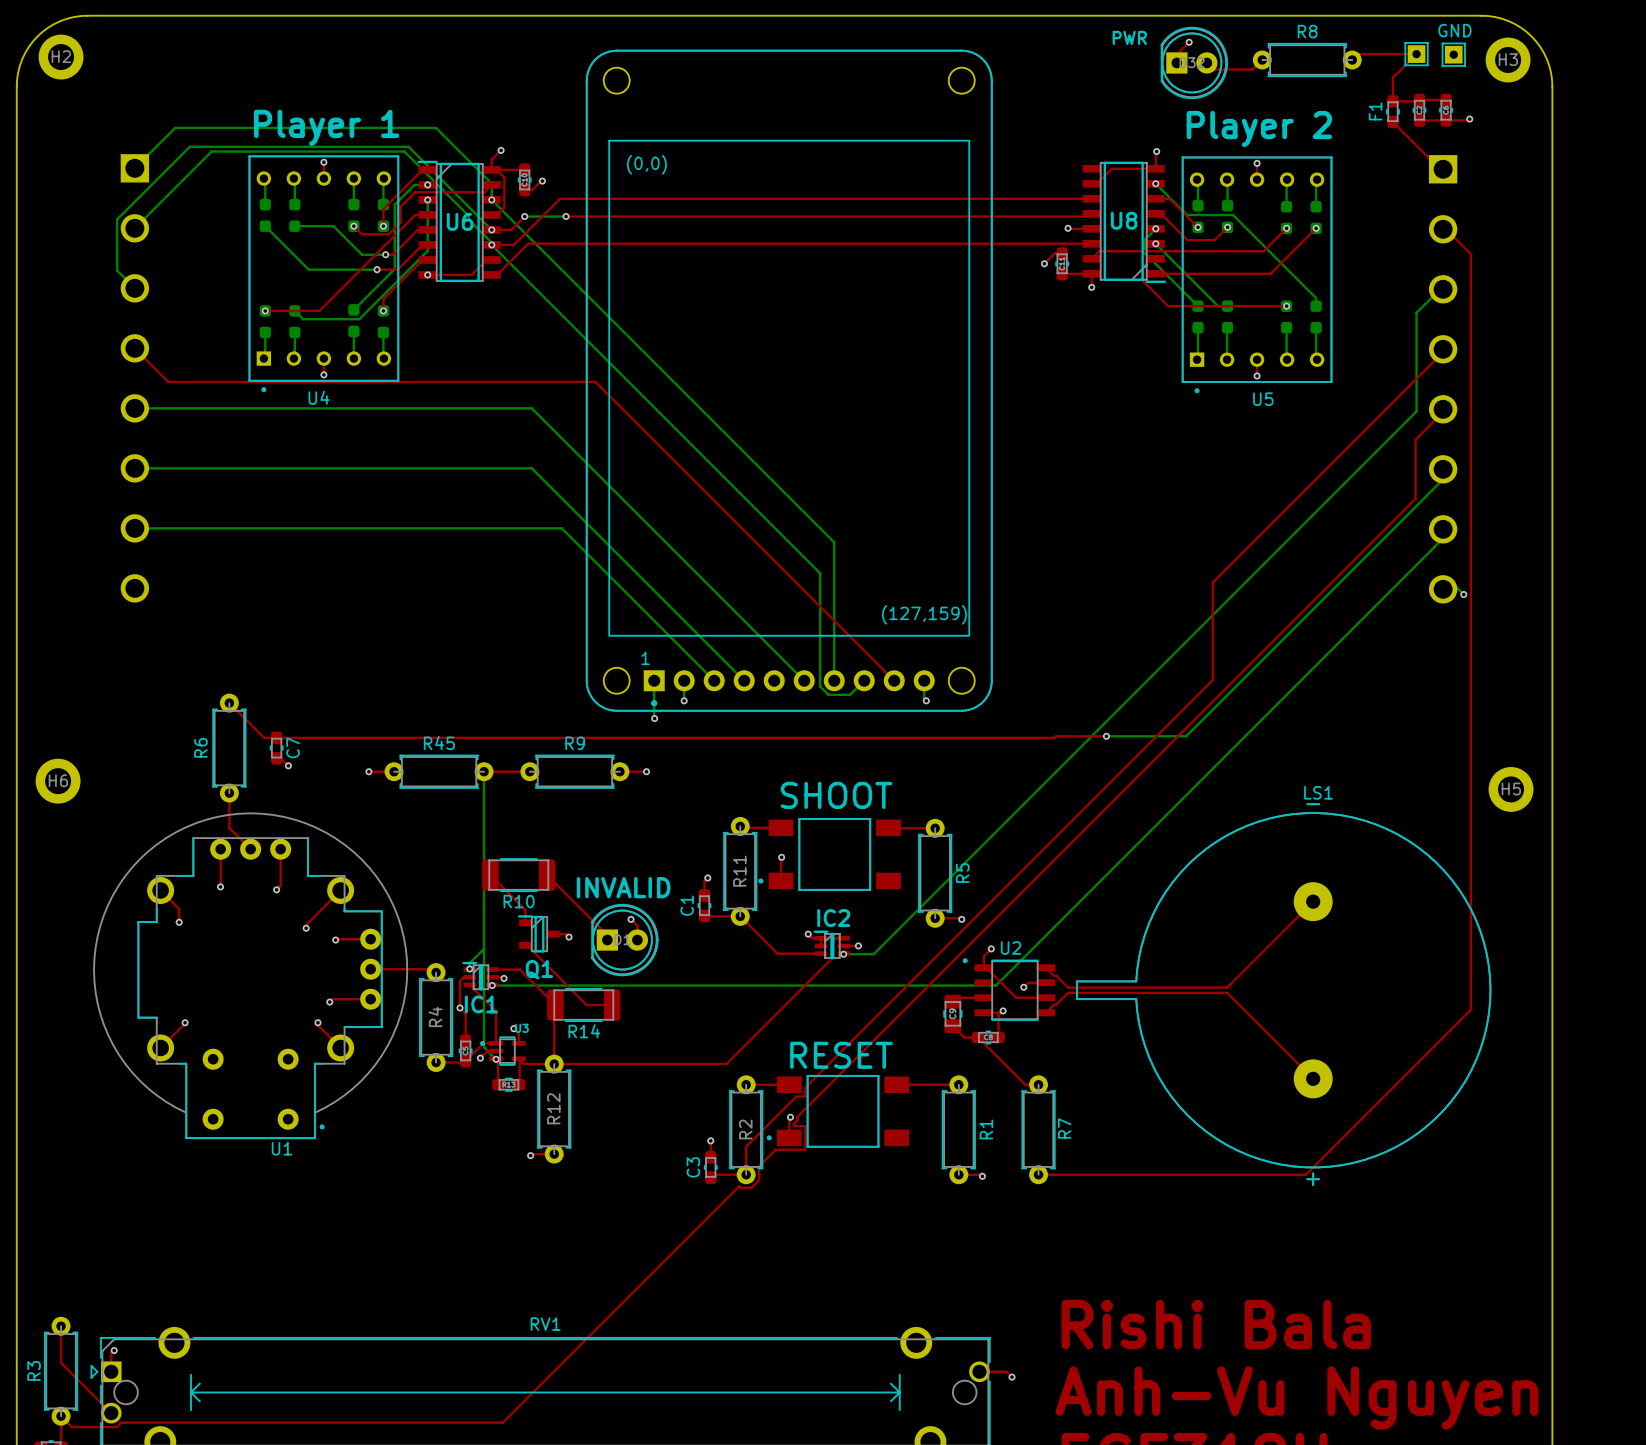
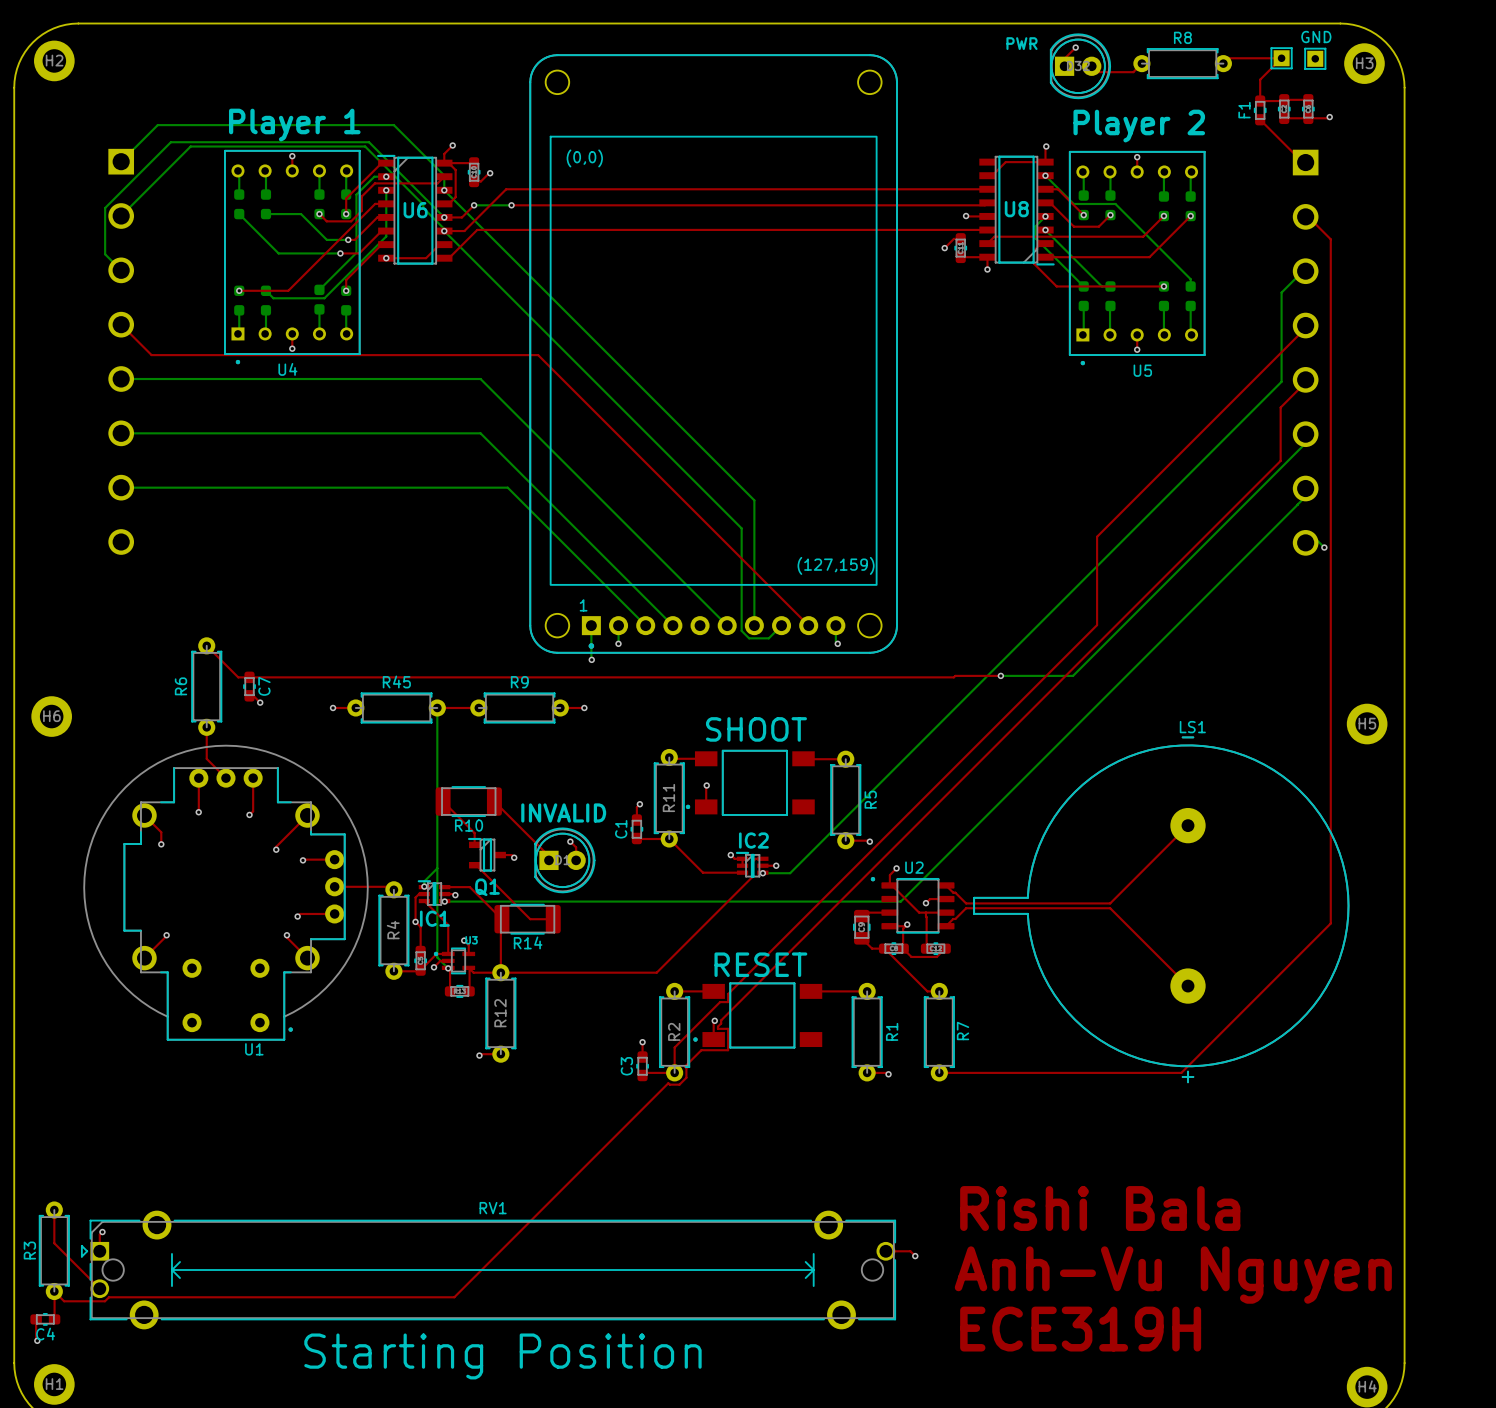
top track: none -> (925, 912) (926, 948)
top track: none -> (903, 948) (911, 956) (936, 956) (945, 948)
part: none -> (935, 948)

